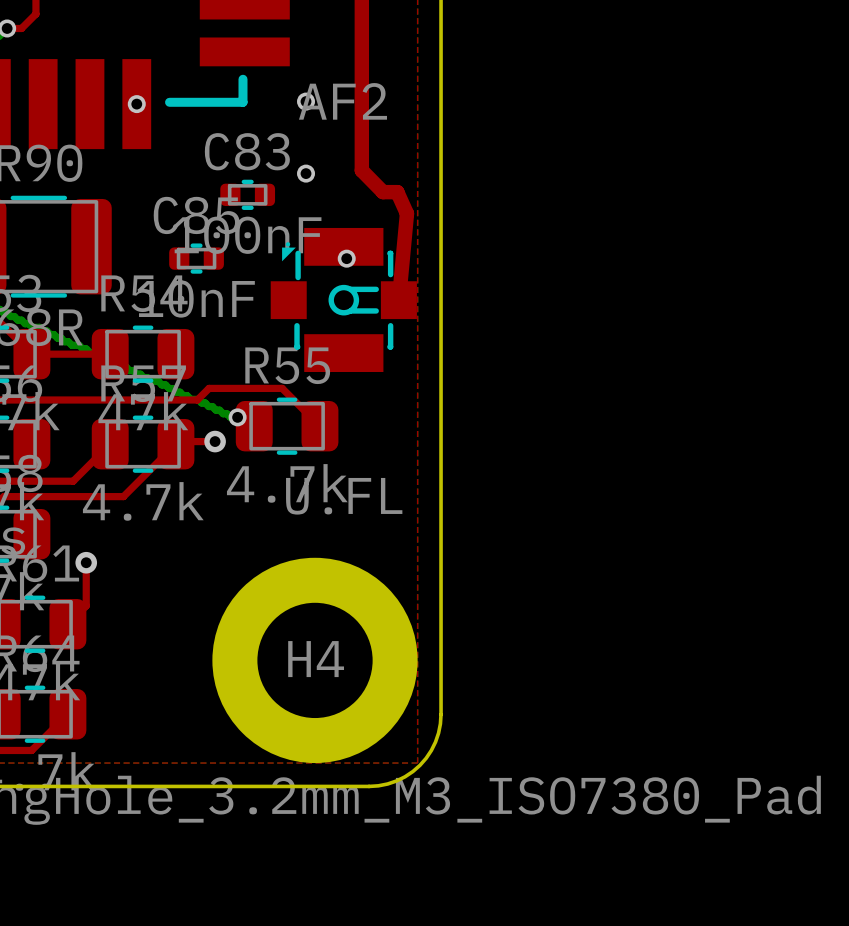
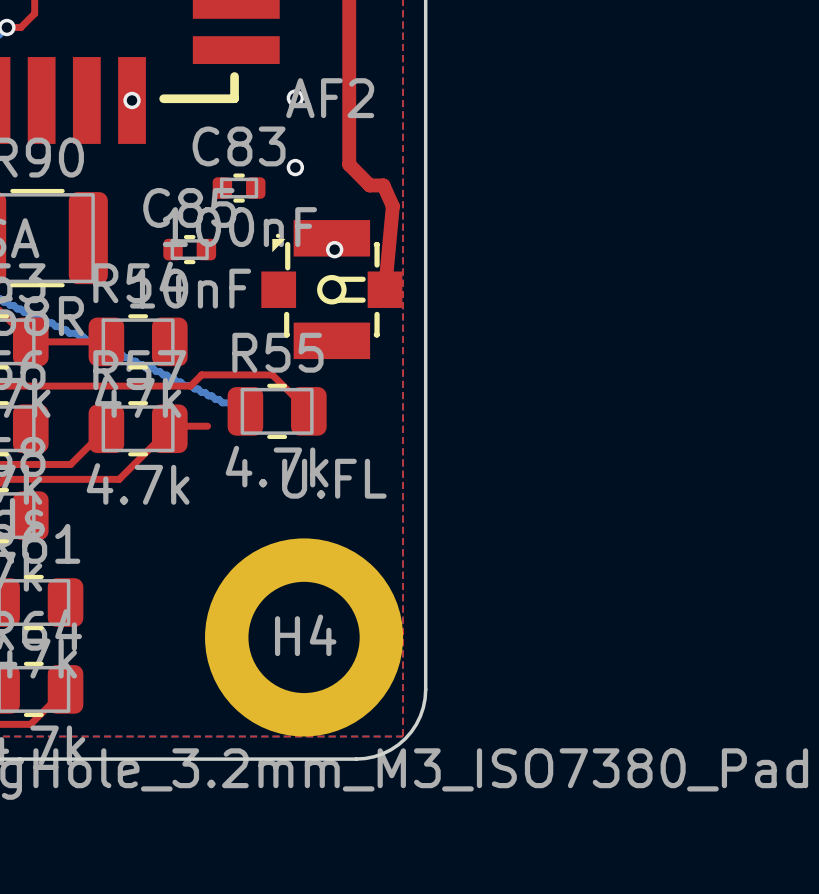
via: (237, 417) -> none
via: (215, 441) -> none
top track: (86, 562) (86, 605) (67, 624) -> none
via: (86, 562) -> none

